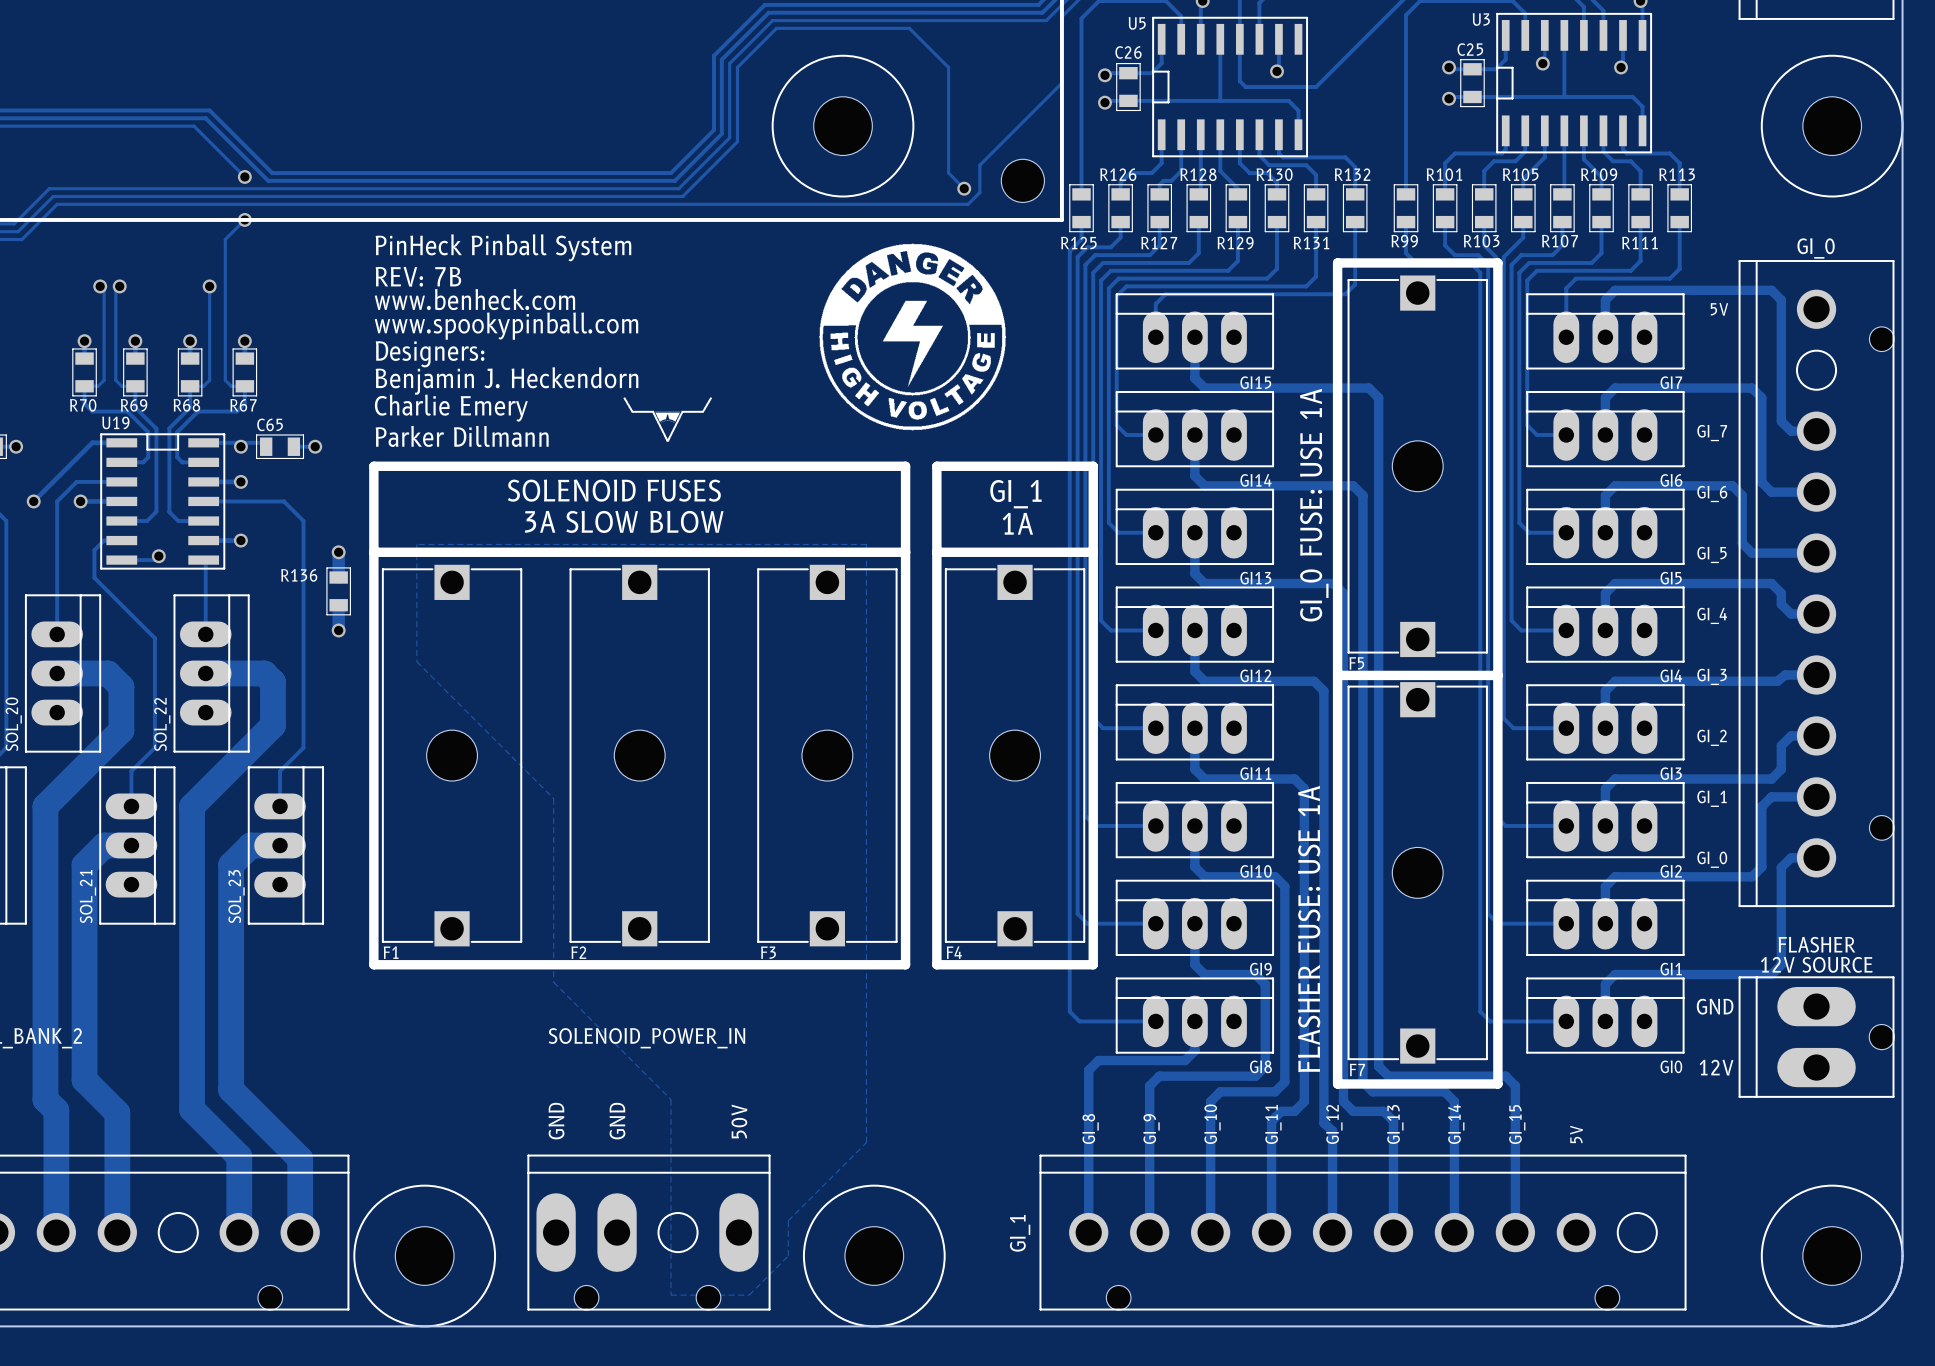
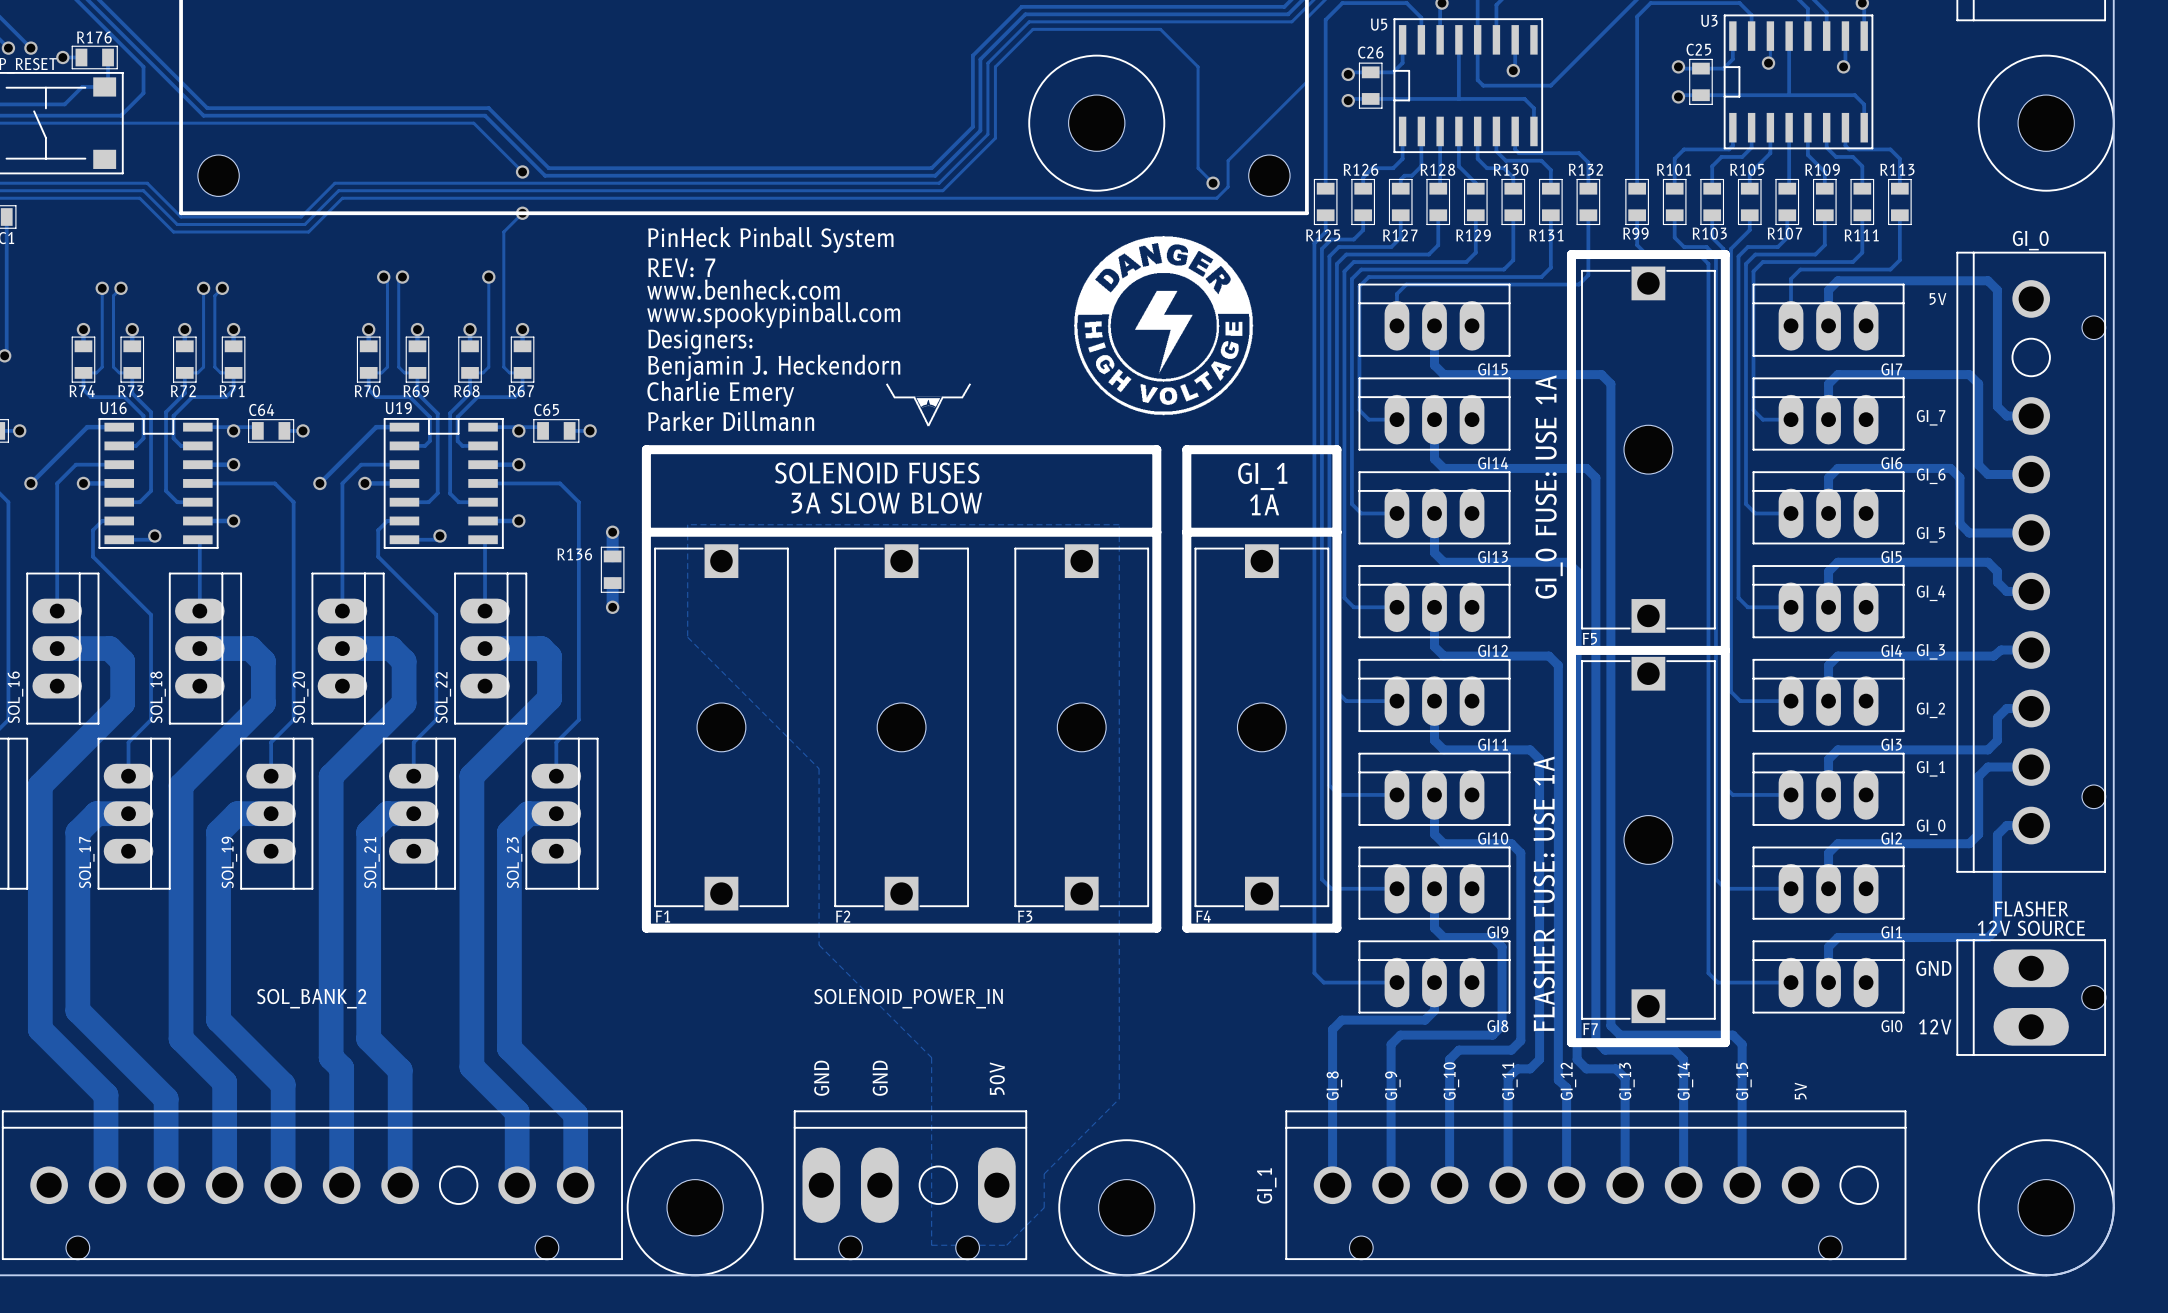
text: REV: 7B (418, 276) -> REV: 7 (681, 267)

